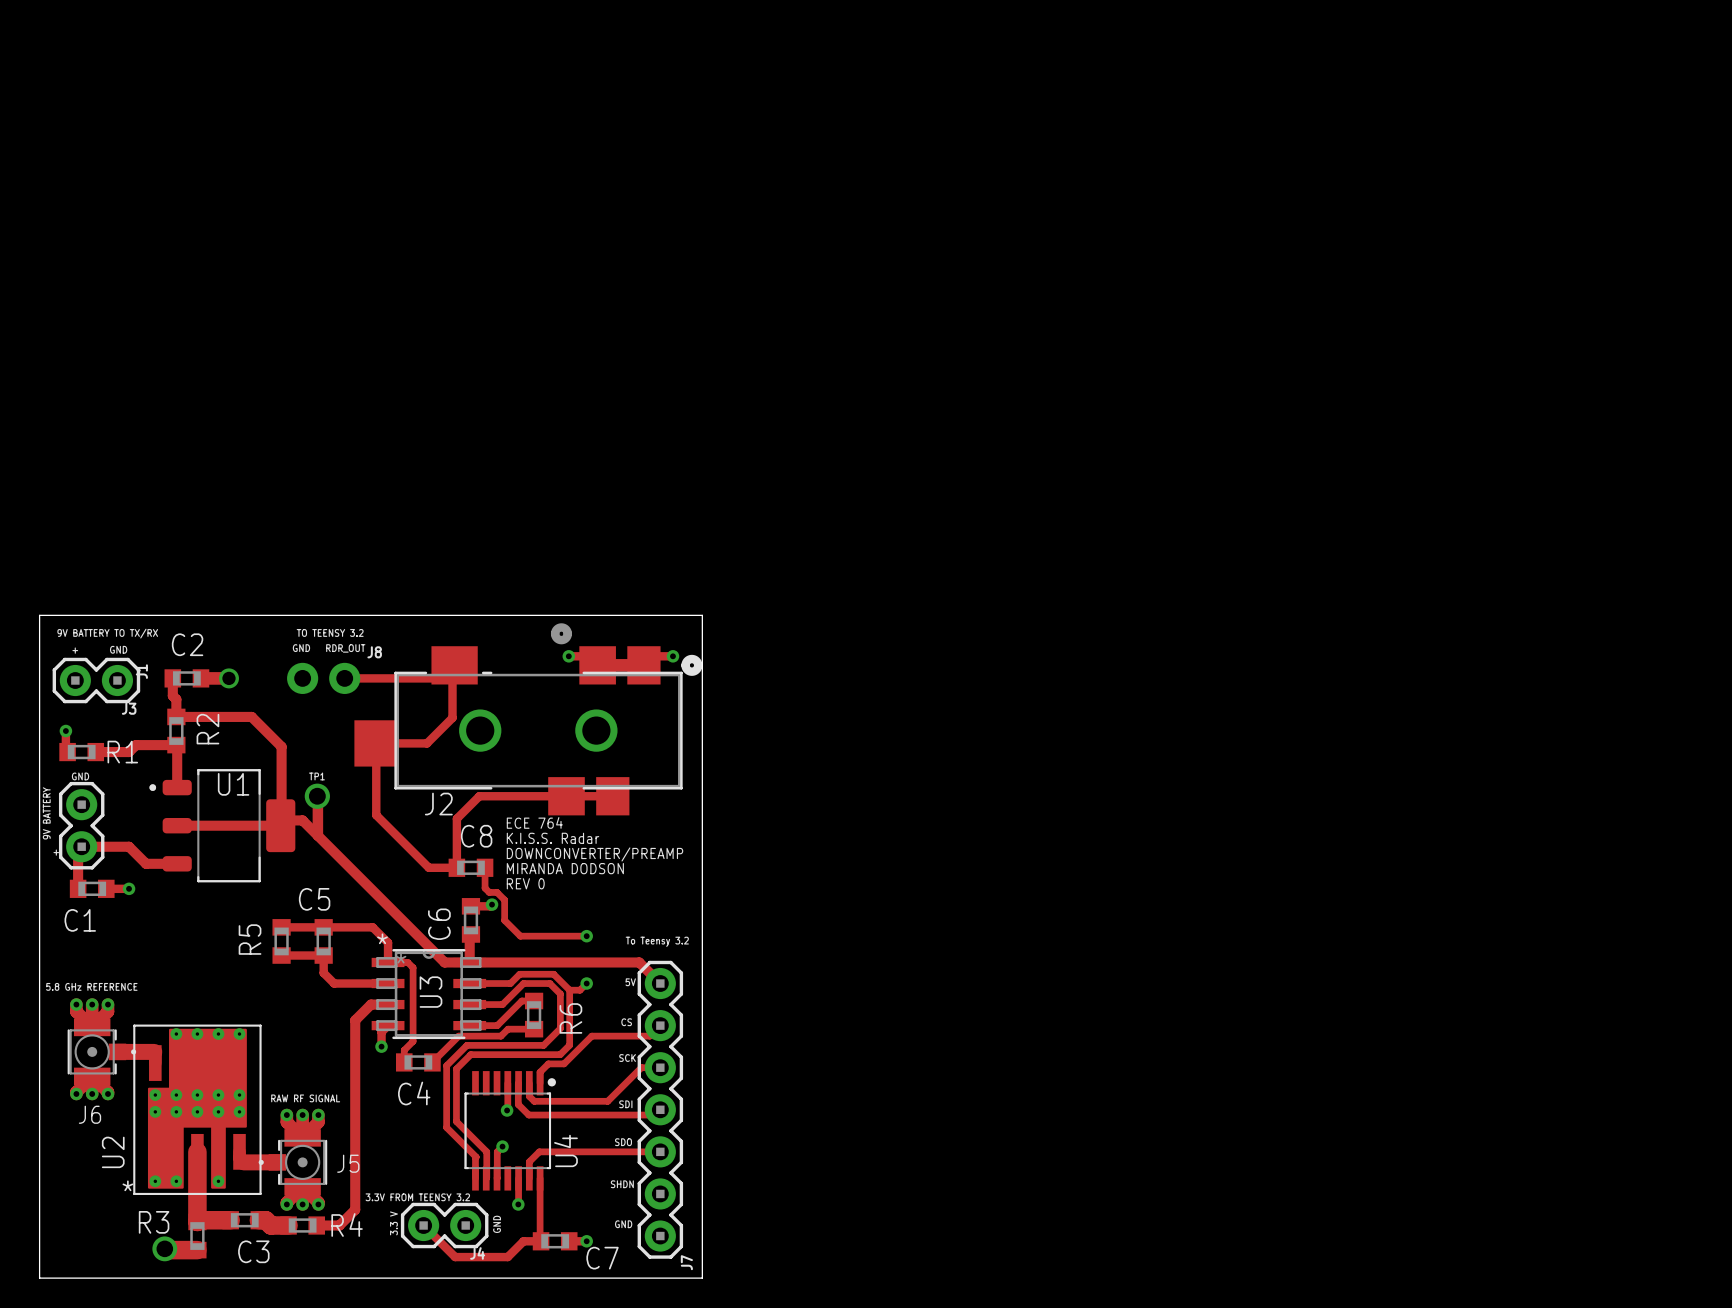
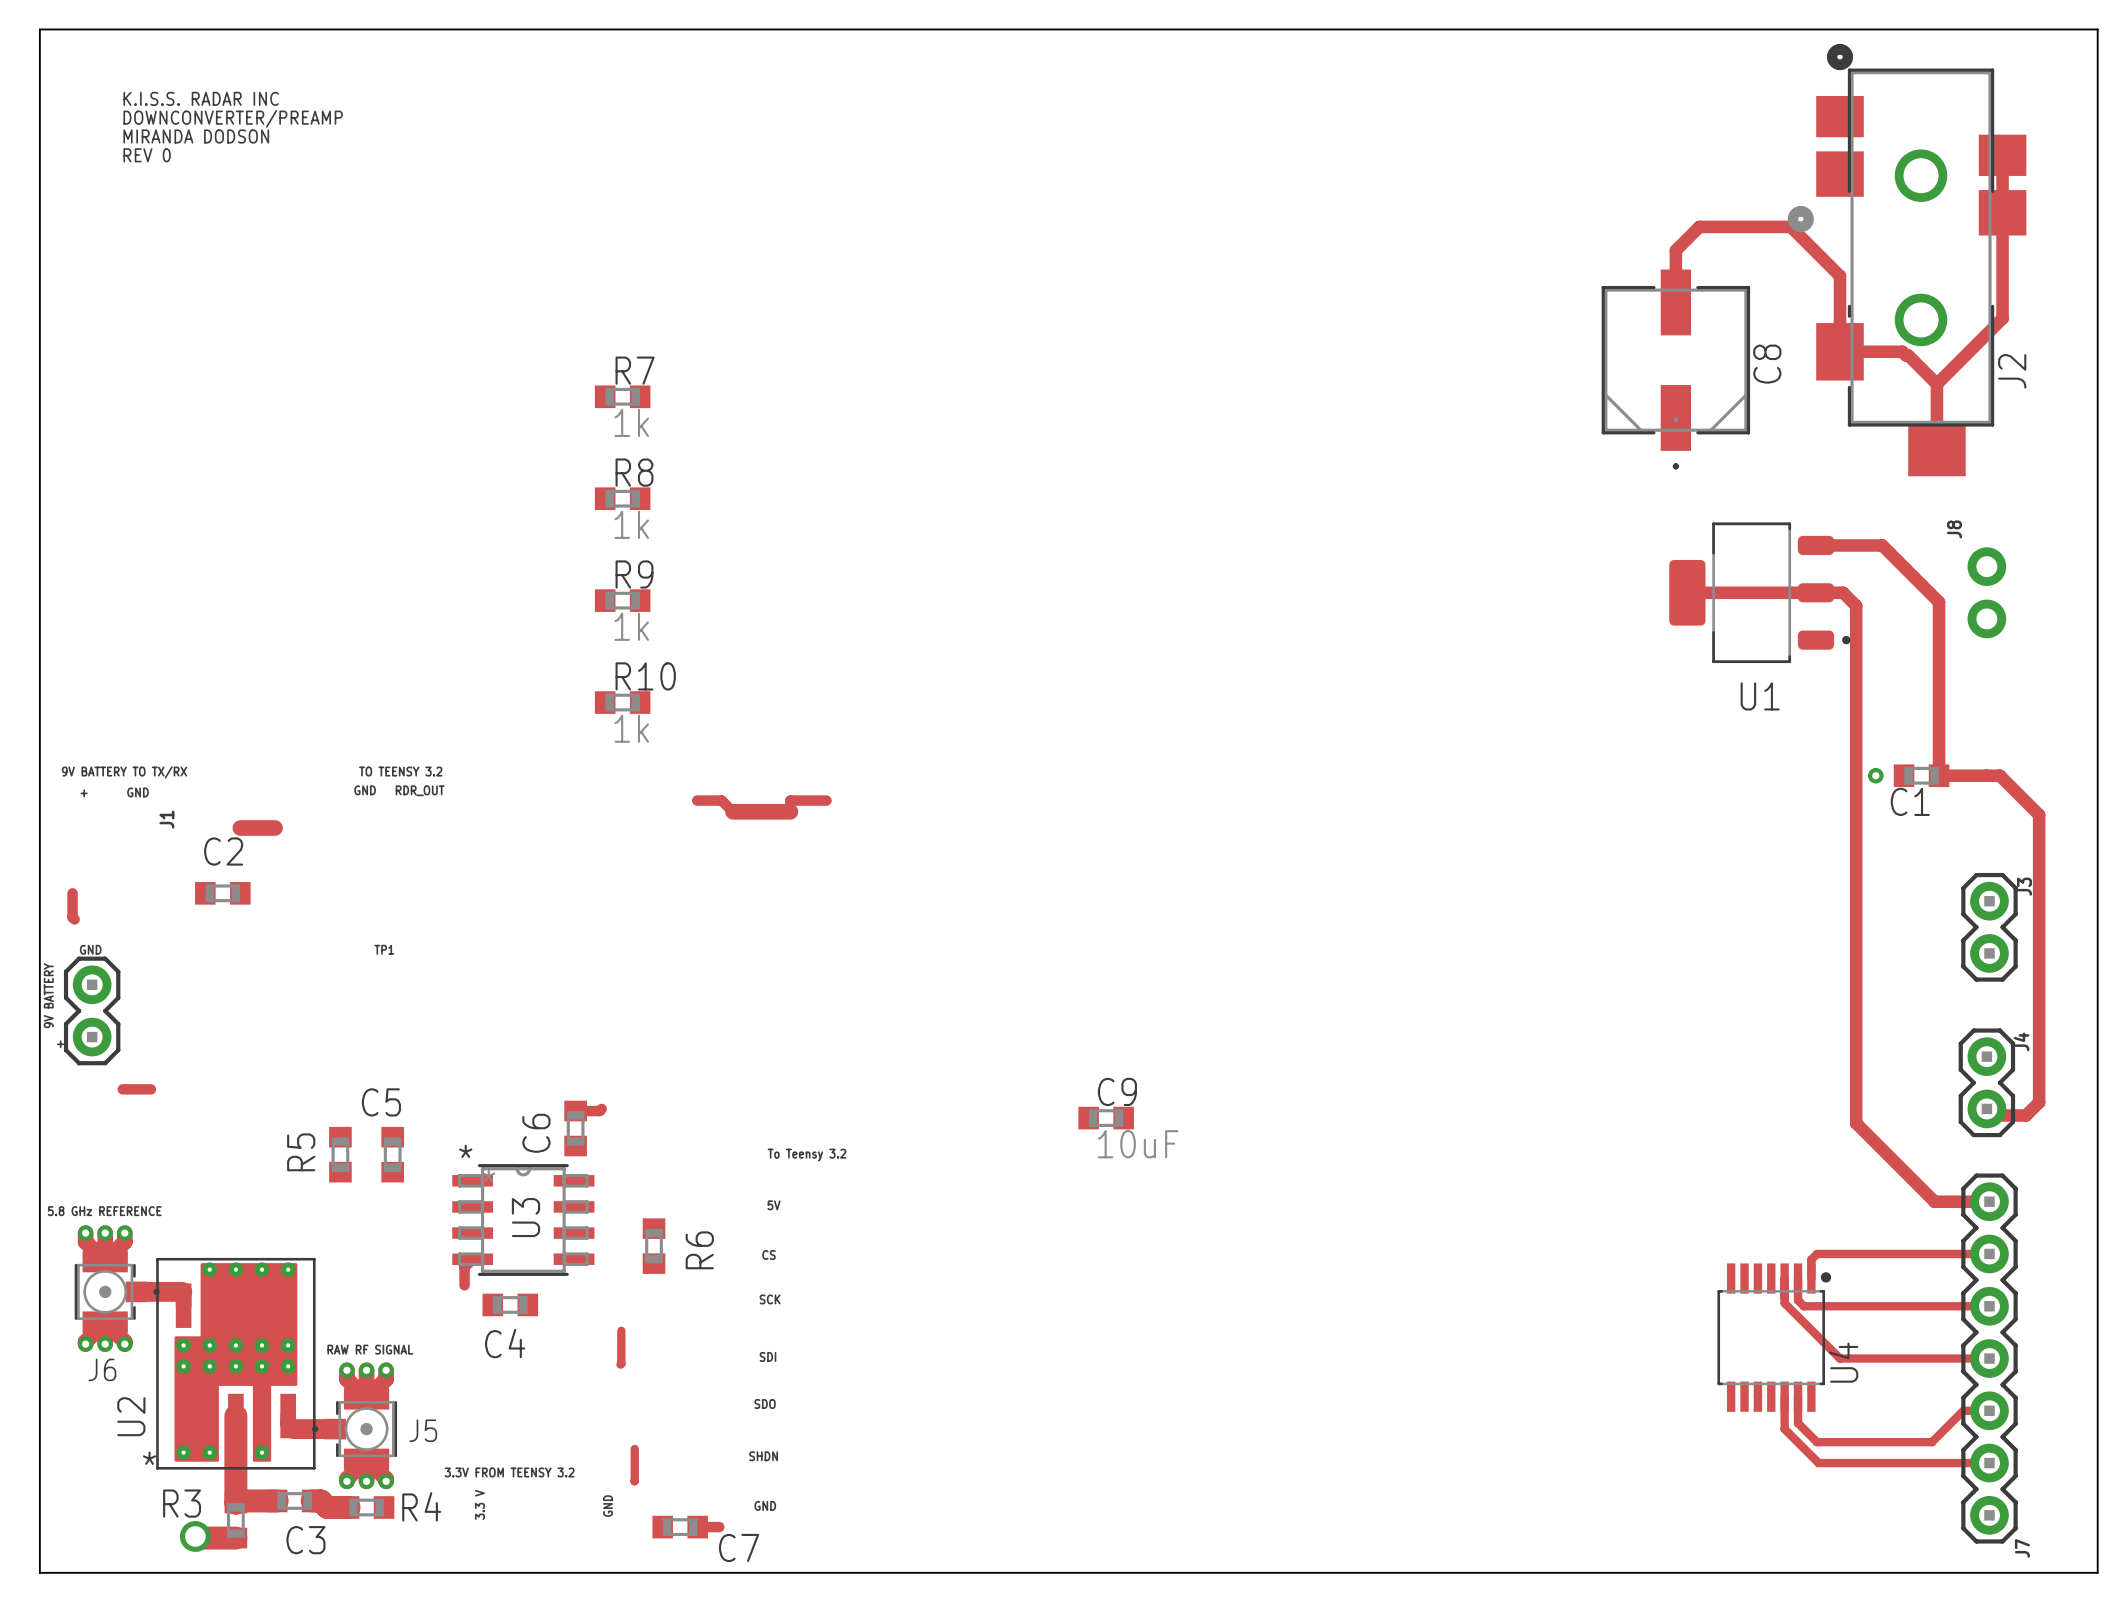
text: none -> K.I.S.S. RADAR INC (201, 98)
text: none -> DOWNCONVERTER/PREAMP (233, 118)
text: none -> MIRANDA DODSON (196, 136)
text: none -> REV 0 (147, 155)
track: none -> (2002, 155) (2002, 318) (1936, 384)
track: none -> (1675, 302) (1675, 250) (1699, 226) (1790, 226) (1839, 276) (1839, 351) (1902, 351) (1936, 384)
track: none -> (1936, 384) (1936, 449)
R7: none -> 1k (622, 396)
R8: none -> 1k (622, 498)
track: none -> (1815, 545) (1882, 545) (1939, 602) (1939, 775) (1999, 775) (2039, 814) (2039, 1102) (2026, 1115) (1993, 1115) (1986, 1108)
track: none -> (1687, 592) (1843, 592) (1856, 605) (1856, 1123) (1934, 1201) (1989, 1201)
R9: none -> 1k (622, 600)
R10: none -> 1k (622, 702)
board edge: (39, 615) (702, 615) (702, 1278) -> (39, 749) (39, 29) (2097, 29) (2097, 1572) (863, 1572)
via: none -> (1875, 775)
J8 name position: J8 (374, 652) -> J8 (1954, 529)
via: (568, 656) -> none
via: (672, 656) -> none
track: (454, 665) (454, 678) (344, 678) -> none
track: (172, 678) (172, 695) (176, 699) (176, 716) (251, 716) (281, 746) (281, 824) -> none
C2 position: (186, 678) -> (222, 893)
via: (228, 678) -> none
J8 rotation: 0° (323, 678) -> 90° clockwise (1986, 592)
J8 position: (323, 678) -> (1986, 592)
track: (452, 678) (452, 717) (426, 743) (375, 743) (376, 815) (428, 867) (456, 867) (456, 818) (479, 796) (612, 796) -> none
J3 rotation: 0° (96, 680) -> 90° clockwise (1989, 927)
J3 position: (96, 680) -> (1989, 927)
J3 name position: J3 (129, 708) -> J3 (2024, 886)
J2 rotation: 0° (528, 719) -> 90° counterclockwise (1907, 260)
J2 position: (528, 719) -> (1907, 260)
via: (65, 731) -> none
R2: (176, 731) -> none
R1: (81, 752) -> none
track: (95, 752) (129, 752) (135, 745) (176, 745) (177, 787) -> none
U1 name position: U1 (233, 784) -> U1 (1760, 696)
track: (317, 796) (317, 835) -> none
via: (317, 796) -> none
text: ECE 764 (534, 822) -> none
track: (177, 825) (280, 825) (286, 820) (302, 820) (444, 962) (639, 962) (660, 983) -> none
U1 rotation: 0° (222, 825) -> 180° (1759, 592)
U1 position: (222, 825) -> (1759, 592)
C8 name position: C8 (476, 836) -> C8 (1767, 364)
text: K.I.S.S. Radar (553, 838) -> none
text: DOWNCONVERTER/PREAMP (594, 854) -> none
C8 footprint: [448, 858, 494, 877] -> [1601, 269, 1751, 470]
track: (177, 863) (146, 863) (129, 846) (81, 846) (78, 850) (78, 888) -> none
track: (485, 867) (485, 888) (489, 892) (497, 892) (504, 900) (504, 920) (520, 936) (586, 936) -> none
text: MIRANDA DODSON (565, 868) -> none
text: REV 0 (525, 883) -> none
C1 position: (92, 888) -> (1921, 775)
via: (129, 888) -> none
via: (492, 904) -> none
C9: none -> 10uF (1106, 1118)
C1 name position: C1 (80, 920) -> C1 (1910, 801)
track: (281, 927) (372, 927) (388, 942) (388, 962) (407, 962) (413, 967) (413, 1041) (404, 1050) (404, 1062) -> none
track: (469, 935) (469, 962) -> none
via: (586, 936) -> none
track: (281, 955) (323, 955) (323, 973) (334, 983) (388, 983) -> none
track: (469, 983) (510, 983) (519, 974) (553, 974) (569, 990) -> none
track: (586, 983) (580, 990) (569, 990) -> none
via: (586, 983) -> none
track: (569, 990) (569, 1045) (560, 1054) (470, 1054) (456, 1068) (456, 1121) (486, 1151) (486, 1178) -> none
track: (532, 1001) (521, 1001) (497, 1025) (469, 1025) -> none
track: (388, 1004) (371, 1004) (355, 1020) (355, 1209) (339, 1225) (316, 1225) -> none
track: (469, 1004) (502, 1004) (523, 983) (549, 983) (560, 994) (560, 1028) (543, 1045) (466, 1045) (446, 1065) (446, 1127) (476, 1157) (475, 1178) -> none
track: none -> (1989, 1253) (1817, 1253) (1811, 1259) (1811, 1278)
track: (660, 1025) (649, 1036) (591, 1036) (564, 1063) (548, 1063) (540, 1072) (540, 1083) -> none
track: (534, 1029) (507, 1029) (501, 1036) (458, 1036) (432, 1062) -> none
track: none -> (1784, 1278) (1784, 1303) (1839, 1358) (1989, 1358)
track: none -> (1798, 1278) (1798, 1300) (1803, 1306) (1989, 1306)
via: (381, 1046) -> none
track: (660, 1067) (641, 1067) (607, 1101) (534, 1101) (529, 1096) (529, 1083) -> none
track: (518, 1083) (518, 1104) (528, 1115) (655, 1115) (660, 1109) -> none
J7 position: (660, 1109) -> (1989, 1358)
via: (507, 1110) -> none
U4 position: (510, 1130) -> (1774, 1337)
track: none -> (1784, 1396) (1784, 1429) (1818, 1463) (1989, 1463)
track: none -> (1798, 1396) (1798, 1423) (1817, 1442) (1932, 1442) (1963, 1410) (1989, 1410)
track: (502, 1146) (497, 1151) (497, 1178) -> none
via: (502, 1146) -> none
track: (660, 1151) (539, 1151) (529, 1161) (529, 1178) -> none
track: (540, 1178) (540, 1240) -> none
via: (518, 1204) -> none
track: (423, 1225) (455, 1257) (507, 1257) (523, 1241) (541, 1241) -> none
J4 rotation: 0° (444, 1225) -> 90° clockwise (1986, 1082)
J4 position: (444, 1225) -> (1986, 1082)
via: (586, 1241) -> none
J4 name position: J4 (477, 1253) -> J4 (2021, 1041)

